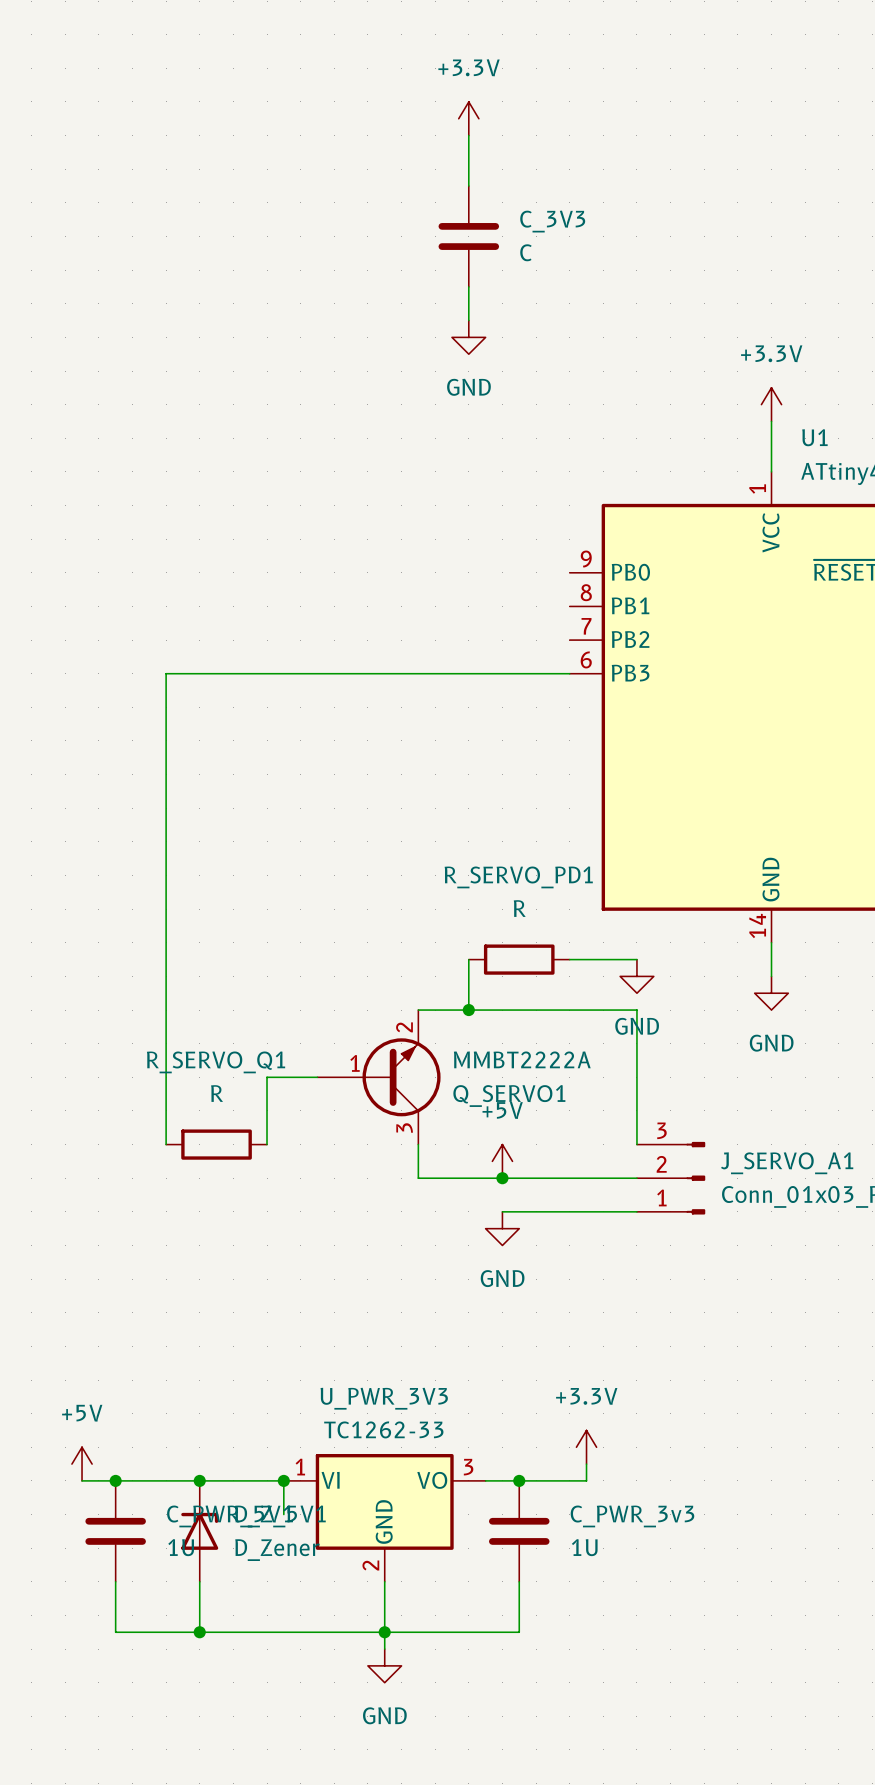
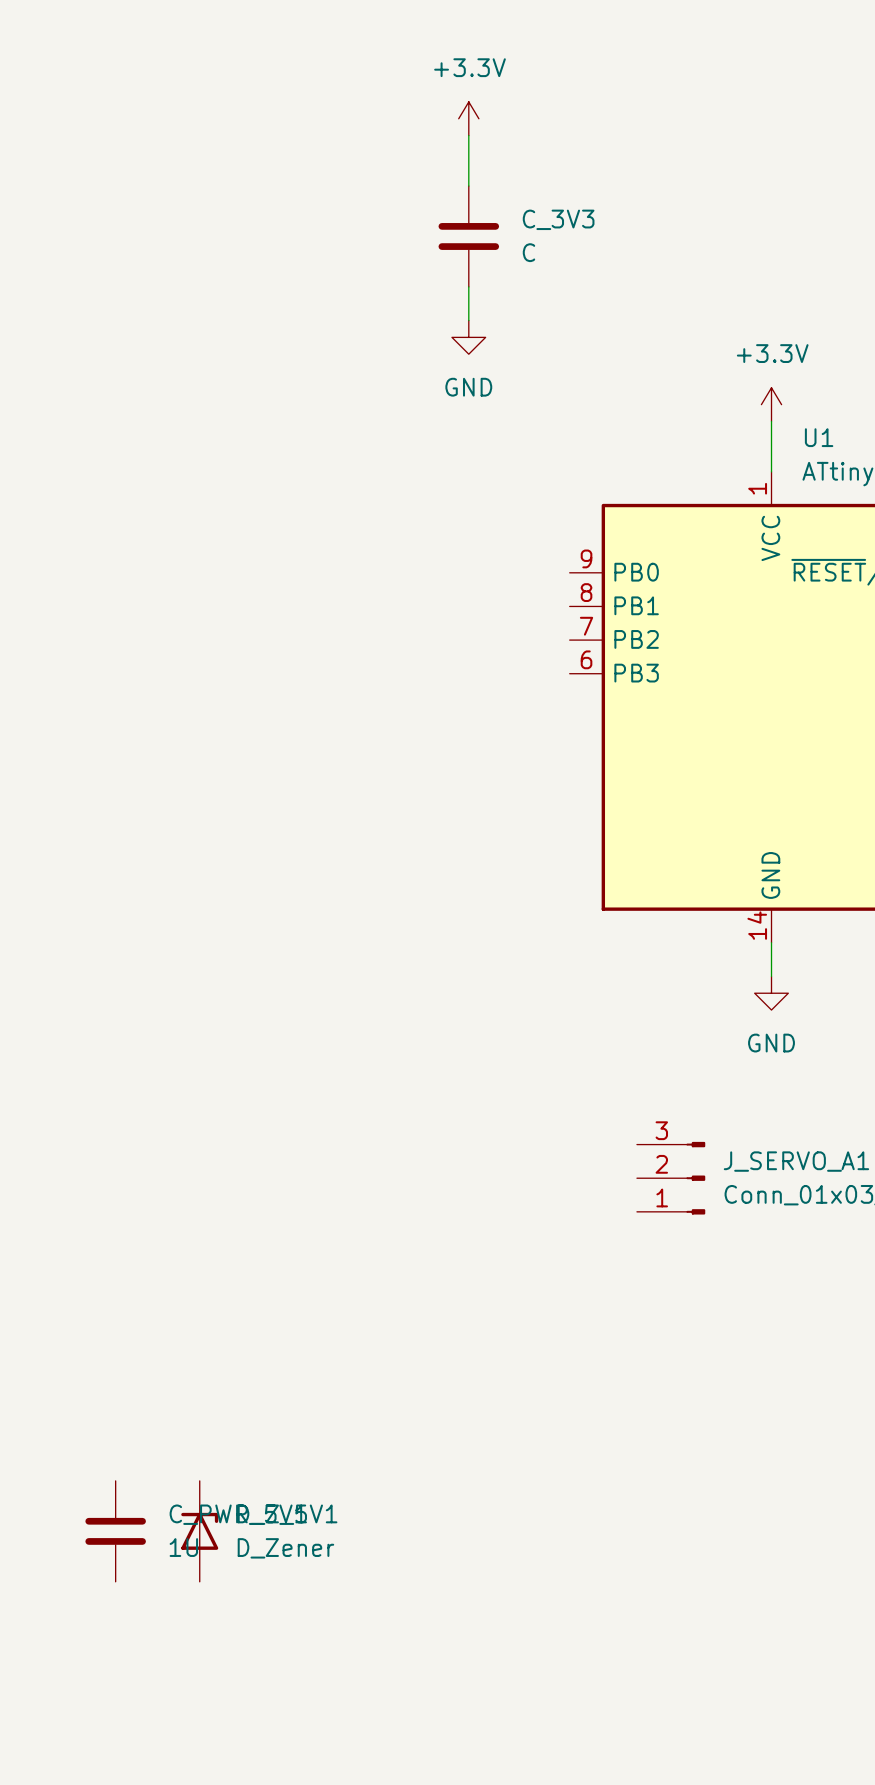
wire: (569, 673) (166, 673) (166, 1144) -> none
wire: (468, 959) (468, 1010) -> none
R_SERVO_PD1: R (519, 959) -> none
wire: (569, 959) (636, 959) -> none
power symbol: GND (636, 976) -> none
wire: (418, 1010) (636, 1010) (636, 1144) -> none
junction: (468, 1010) -> none
wire: (317, 1077) (267, 1077) (267, 1144) -> none
Q_SERVO1: MMBT2222A (379, 1077) -> none
R_SERVO_Q1: R (216, 1144) -> none
wire: (418, 1144) (418, 1178) (636, 1178) -> none
power symbol: +5V (502, 1161) -> none
junction: (502, 1178) -> none
wire: (502, 1211) (636, 1211) -> none
power symbol: GND (502, 1228) -> none
power symbol: +3.3V (586, 1447) -> none
power symbol: +5V (82, 1464) -> none
wire: (586, 1464) (586, 1480) (485, 1480) -> none
wire: (82, 1480) (283, 1480) (283, 1514) -> none
junction: (115, 1480) -> none
junction: (199, 1480) -> none
junction: (283, 1480) -> none
junction: (519, 1480) -> none
U_PWR_3V3: TC1262-33 (384, 1517) -> none
C_PWR_3v3: 1U (519, 1531) -> none
wire: (115, 1581) (115, 1632) (519, 1632) (519, 1581) -> none
wire: (199, 1581) (199, 1632) -> none
wire: (384, 1581) (384, 1649) -> none
junction: (199, 1632) -> none
junction: (384, 1632) -> none
power symbol: GND (384, 1665) -> none

